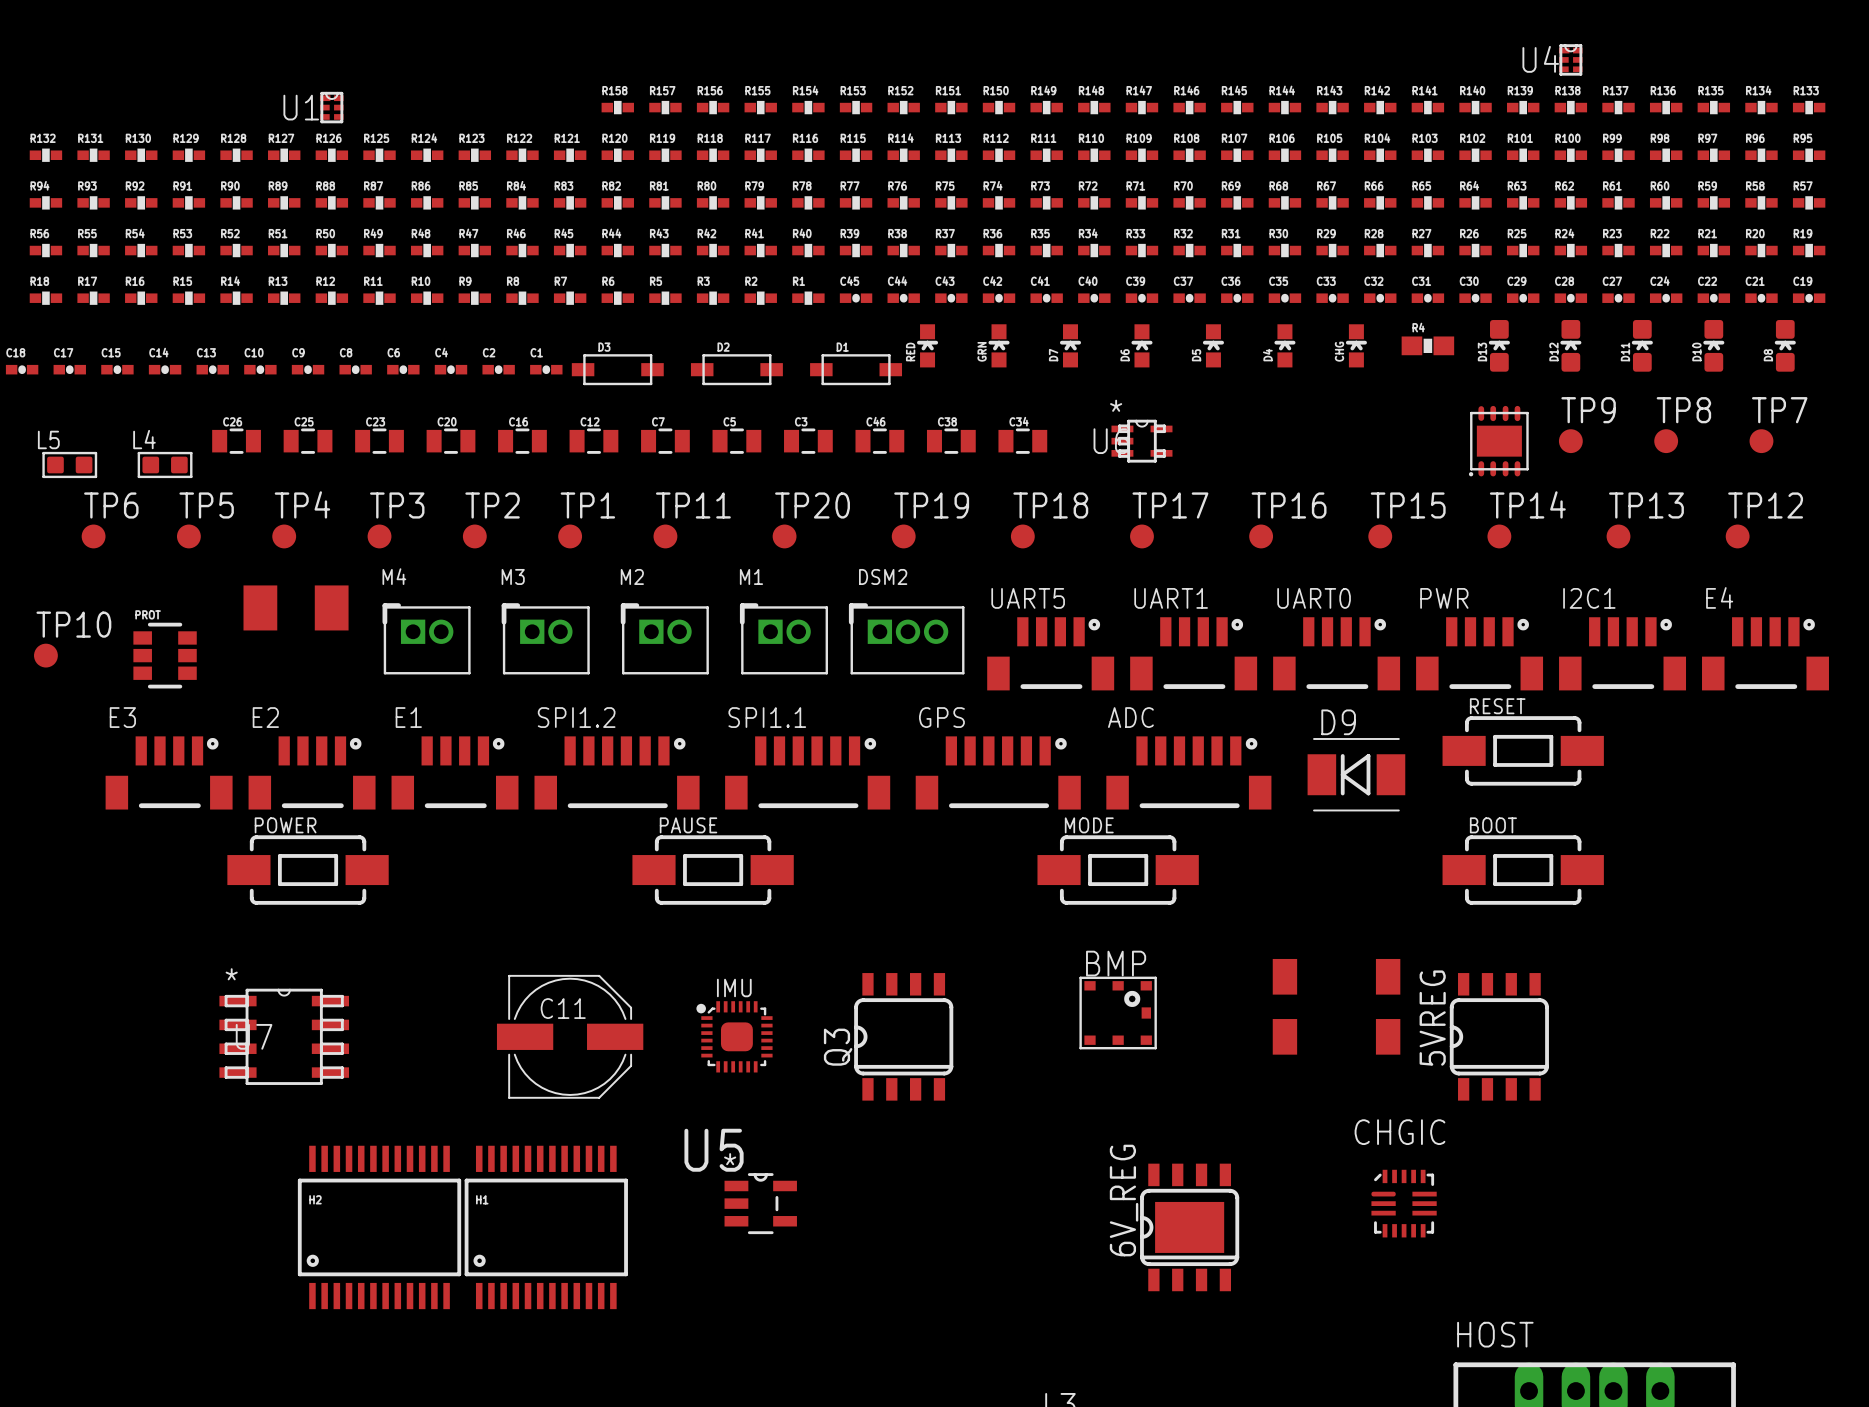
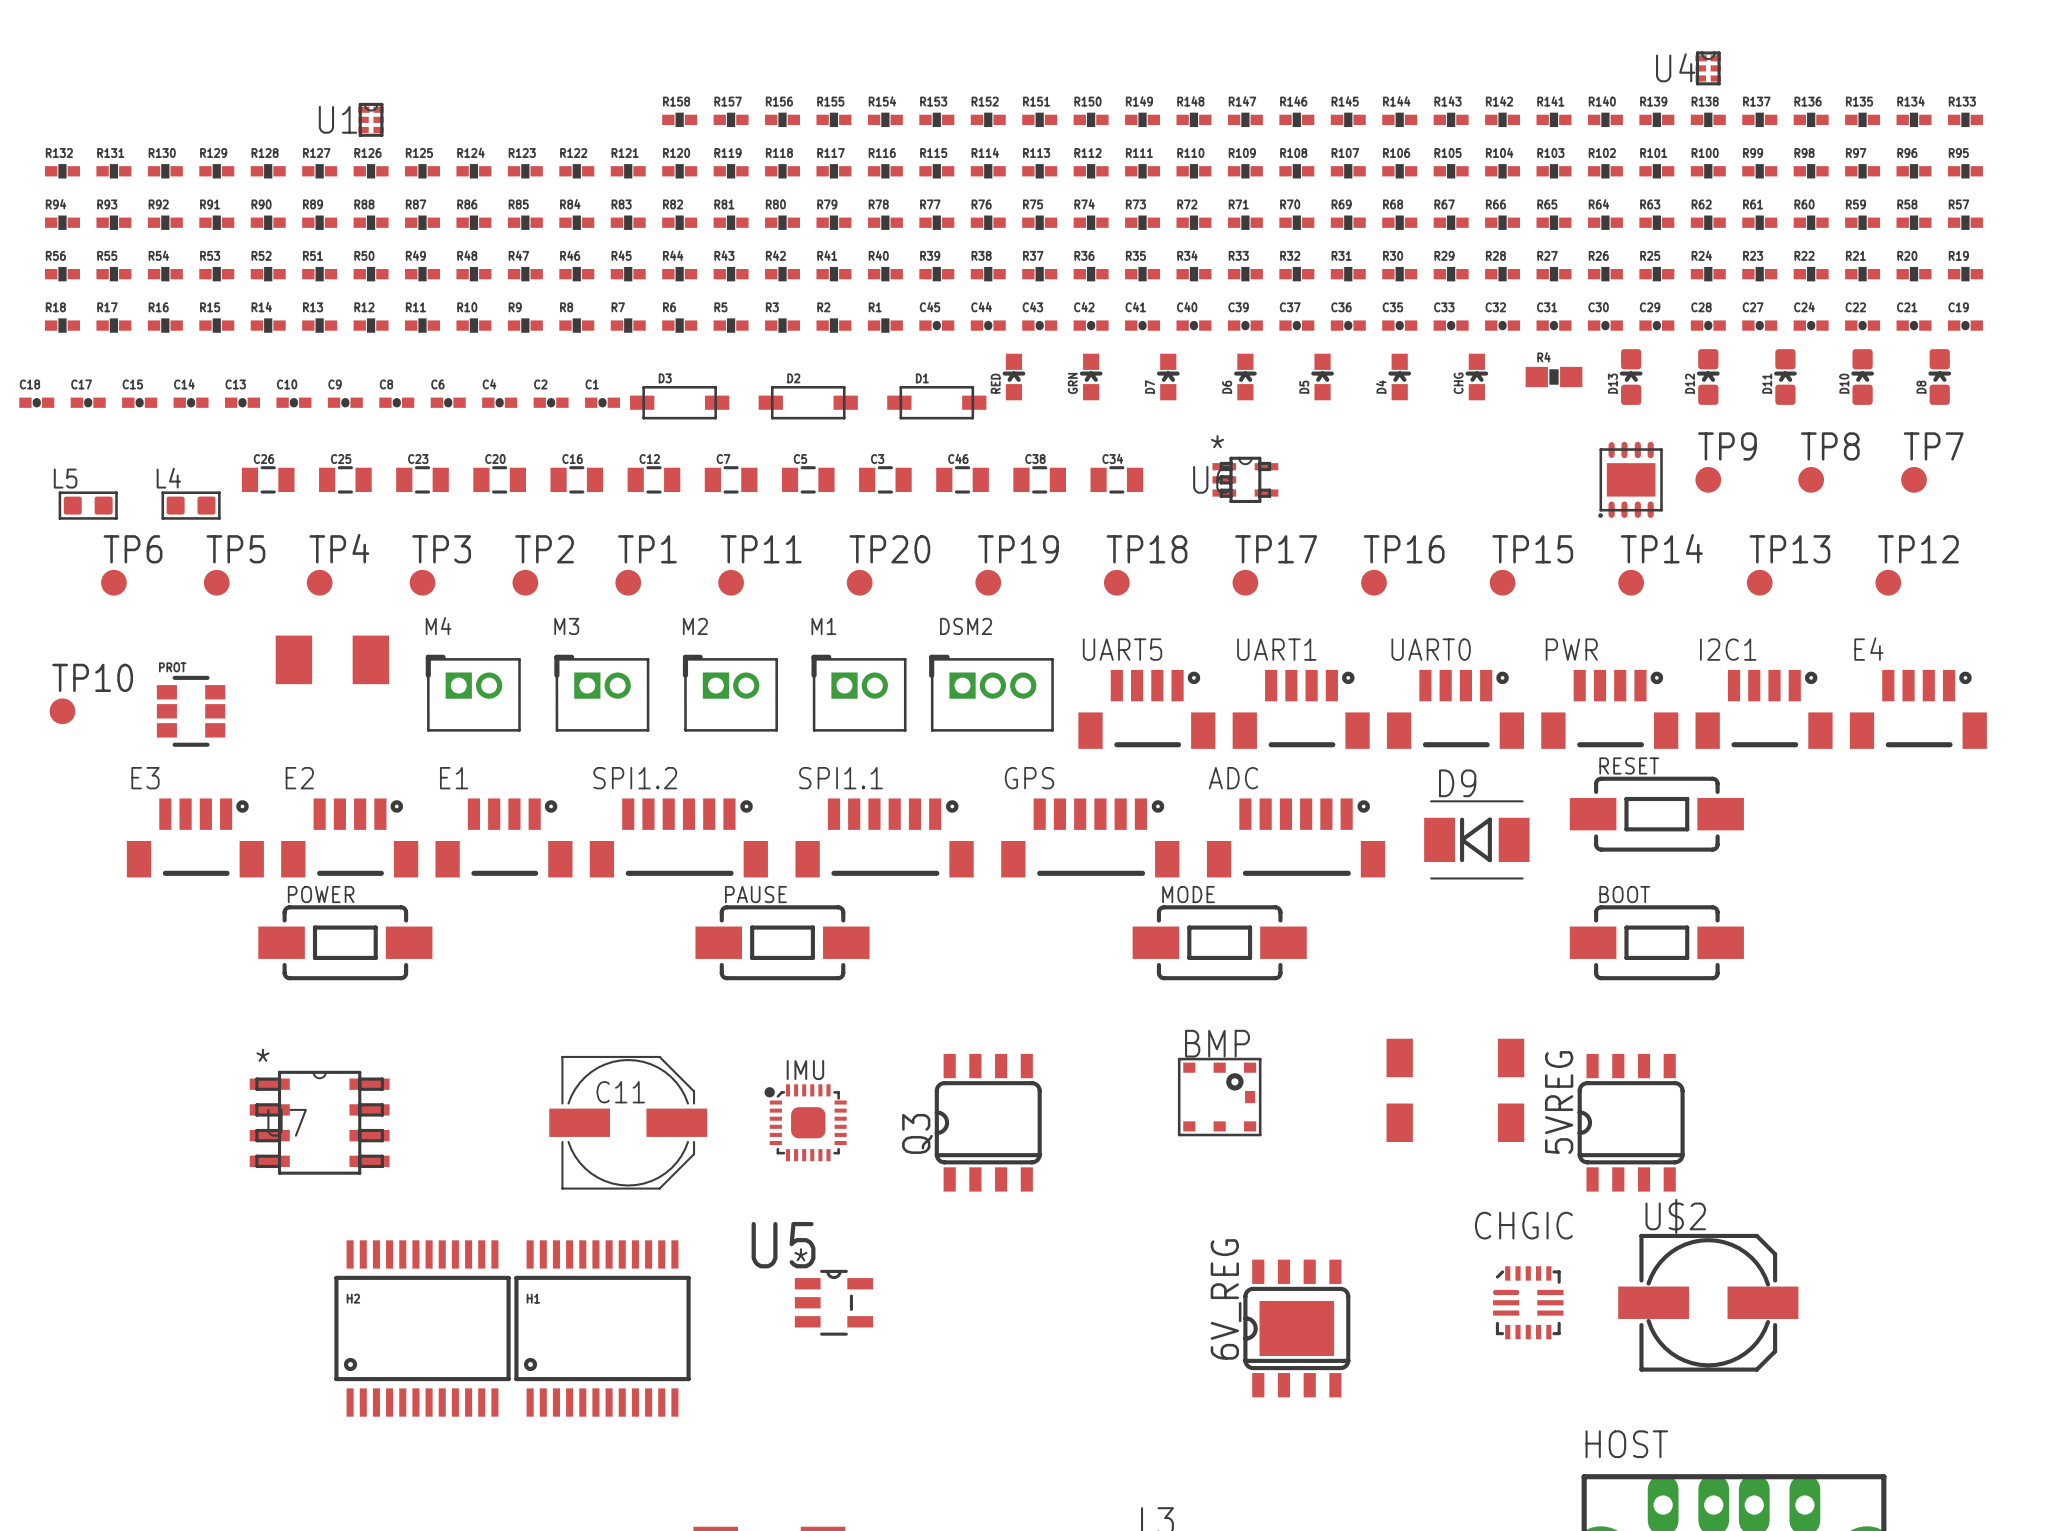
U$2: none -> (1708, 1302)

